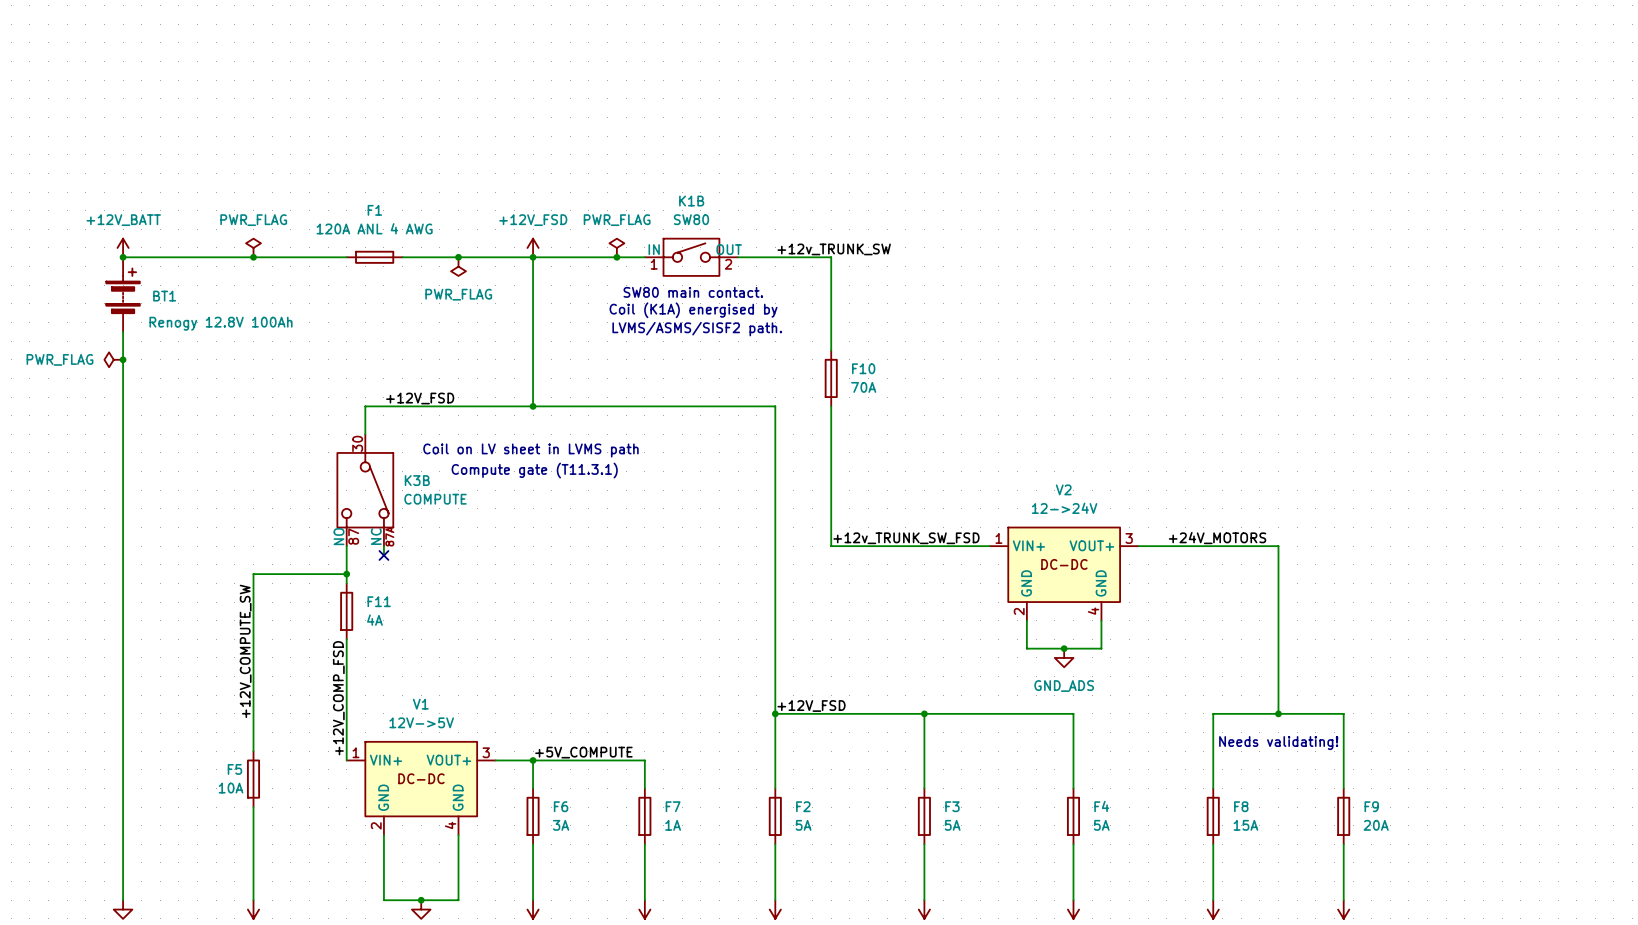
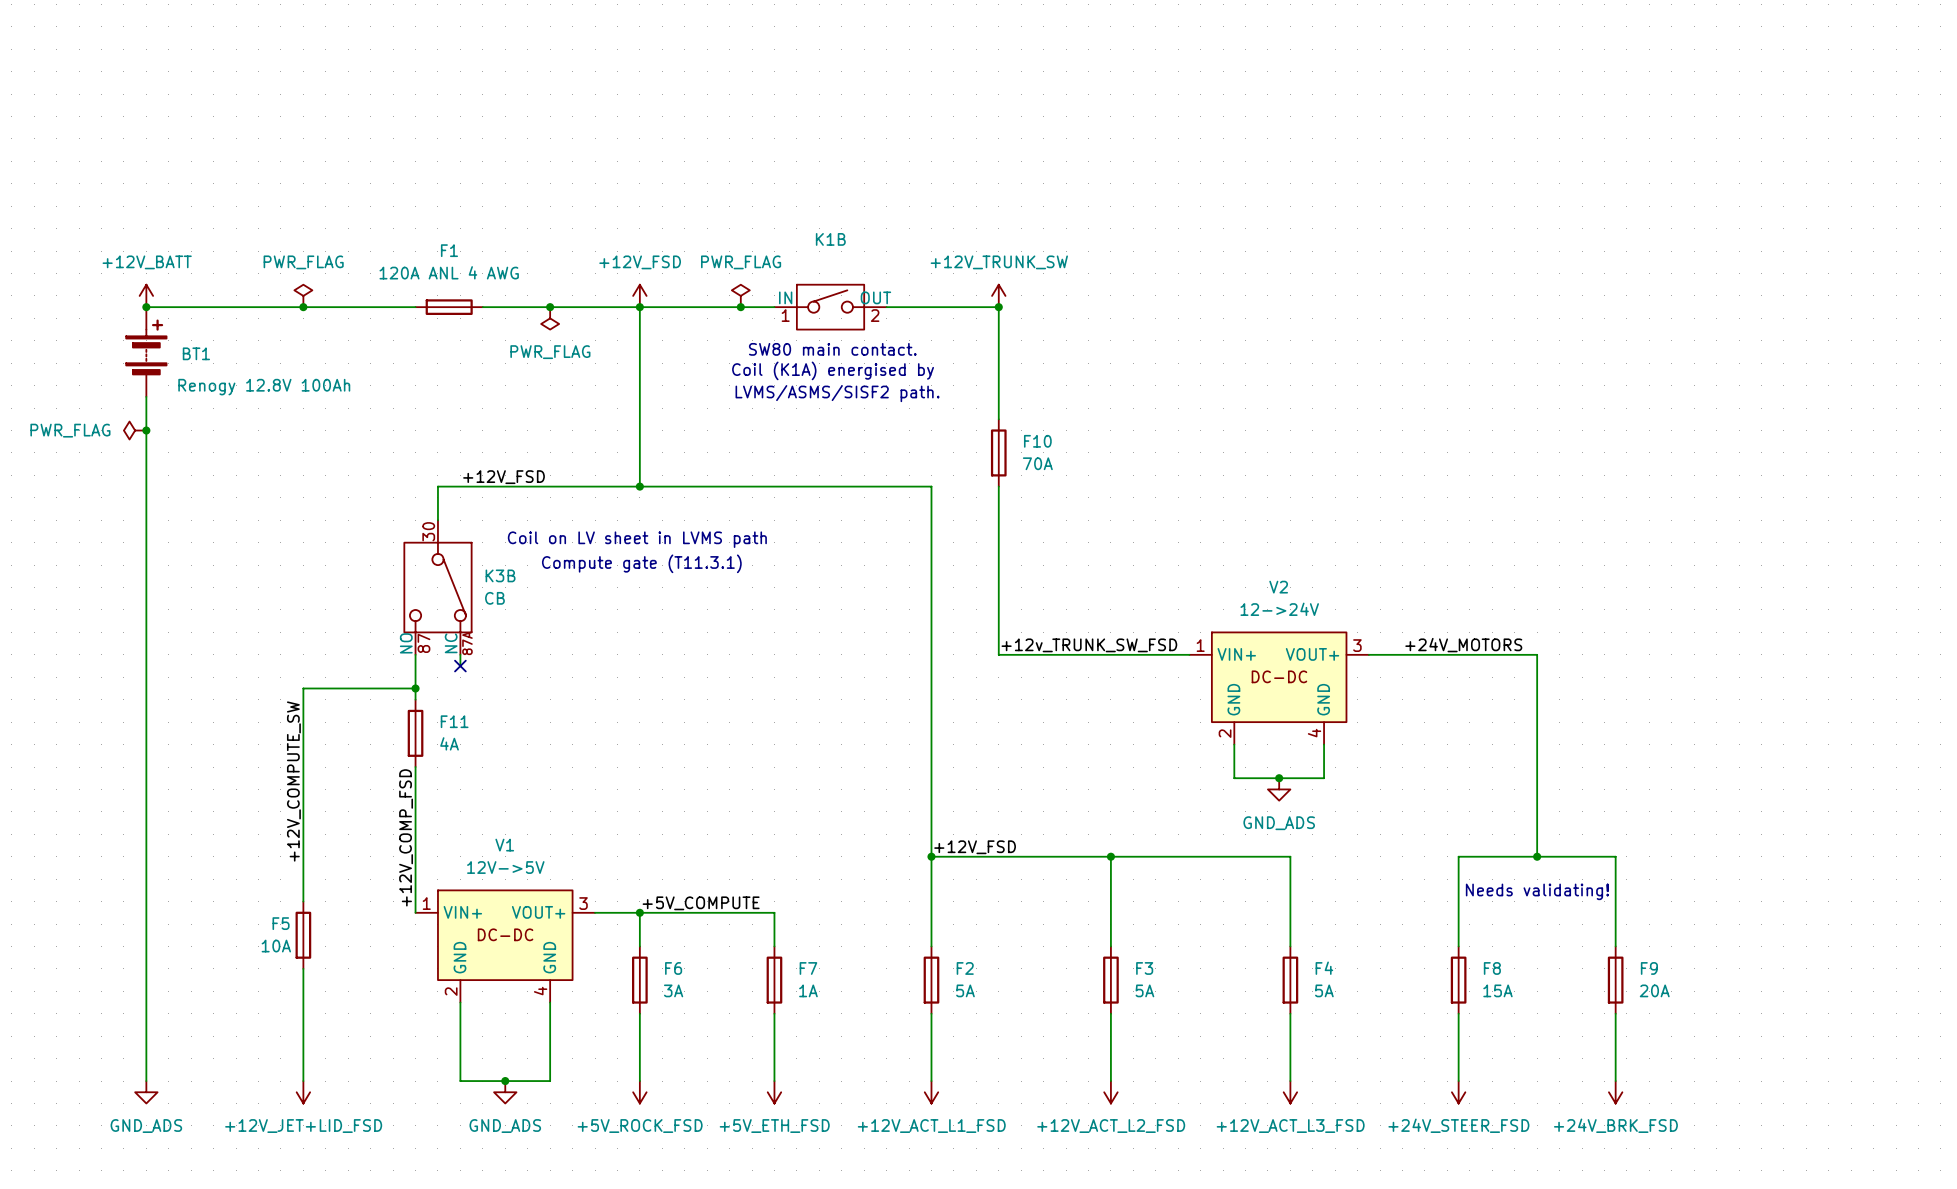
K1B value: SW80 (691, 219) -> none
power symbol: none -> +12V_TRUNK_SW (998, 295)
label: +12v_TRUNK_SW (834, 249) -> none
junction: none -> (998, 307)
K3B value: COMPUTE (435, 499) -> CB (494, 598)

